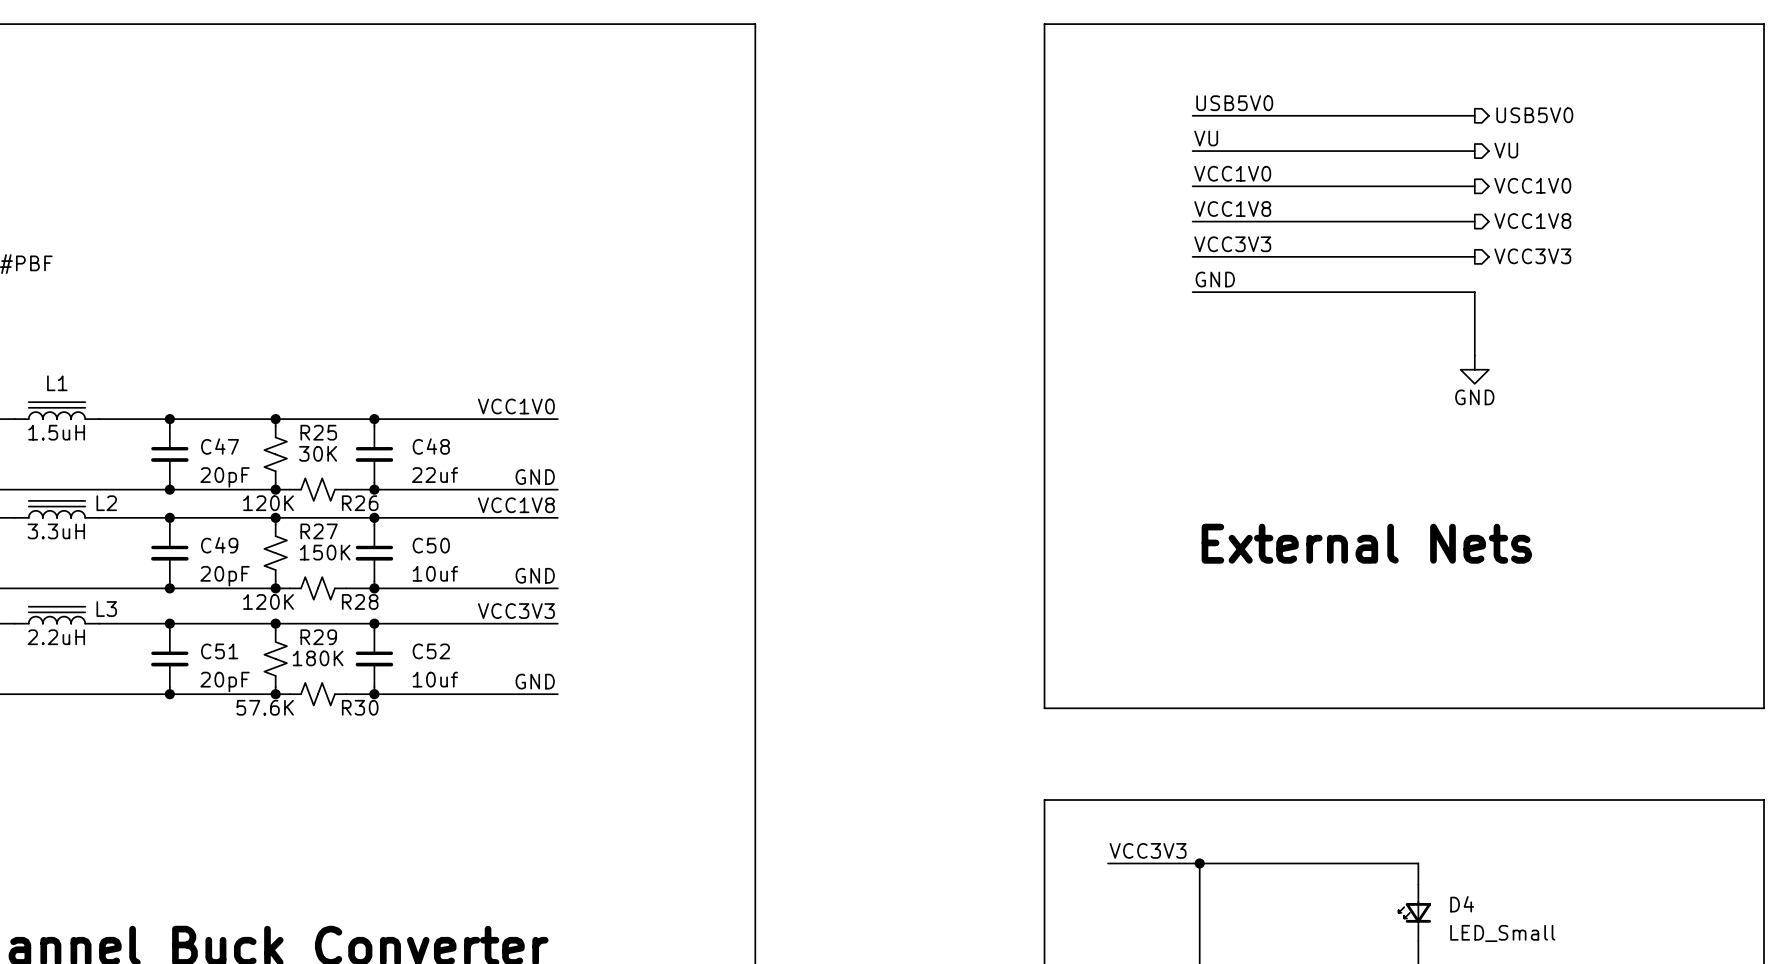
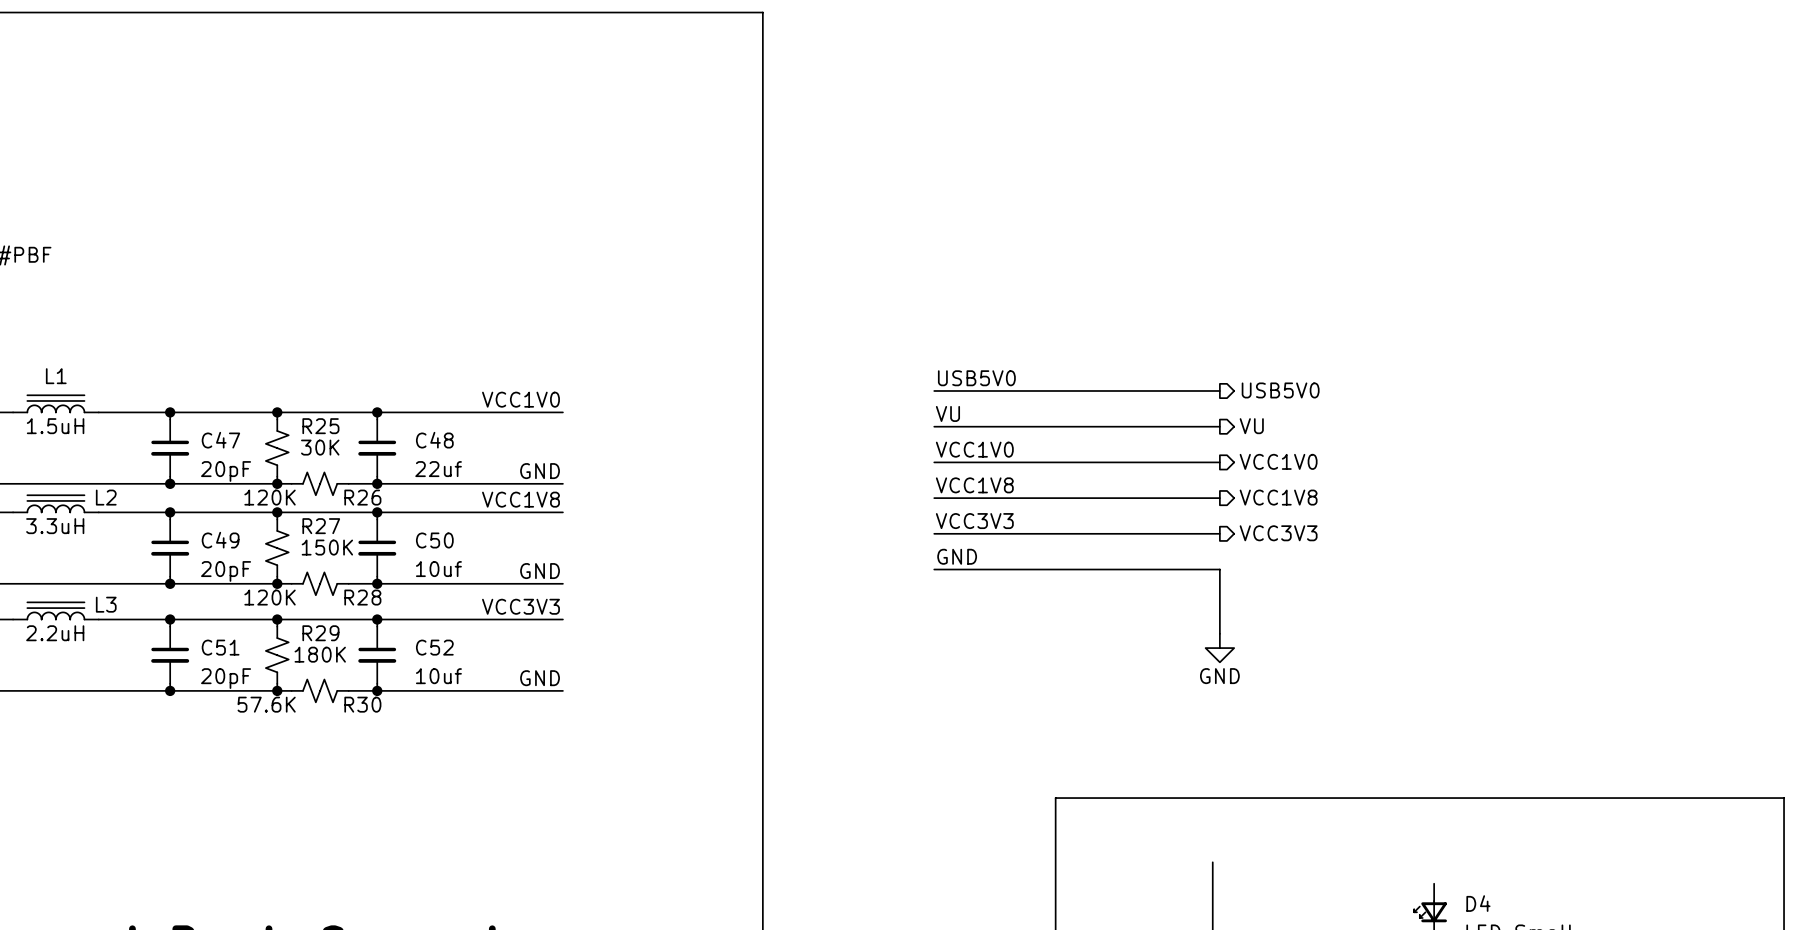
line: (1044, 24) (1044, 708) (1764, 708) (1764, 24) (1044, 24) -> none
label: USB5V0 (1234, 103) -> none
wire: (1192, 115) (1474, 115) -> none
hierarchical label: USB5V0 (1534, 115) -> none
label: VU (1206, 138) -> none
hierarchical label: VU (1506, 150) -> none
wire: (1192, 151) (1474, 151) -> none
label: VCC1V0 (1232, 173) -> none
hierarchical label: VCC1V0 (1532, 185) -> none
wire: (1192, 186) (1474, 186) -> none
label: VCC1V8 (1232, 209) -> none
wire: (1192, 221) (1474, 221) -> none
hierarchical label: VCC1V8 (1532, 221) -> none
label: VCC3V3 (1232, 244) -> none
wire: (1192, 256) (1474, 256) -> none
hierarchical label: VCC3V3 (1532, 256) -> none
label: GND (1215, 279) -> none
wire: (1192, 292) (1474, 292) (1474, 355) -> none
power symbol: GND (1474, 369) -> none
label: none -> USB5V0 (976, 378)
wire: none -> (934, 390) (1219, 390)
hierarchical label: none -> USB5V0 (1280, 390)
label: none -> VU (947, 413)
hierarchical label: none -> VU (1251, 426)
wire: none -> (934, 426) (1219, 426)
label: none -> VCC1V0 (974, 449)
hierarchical label: none -> VCC1V0 (1278, 461)
wire: none -> (934, 462) (1219, 462)
label: none -> VCC1V8 (974, 485)
wire: none -> (934, 498) (1219, 498)
hierarchical label: none -> VCC1V8 (1278, 497)
label: none -> VCC3V3 (974, 521)
hierarchical label: none -> VCC3V3 (1278, 533)
wire: none -> (934, 533) (1219, 533)
text: External Nets (1366, 543) -> none
label: none -> GND (957, 556)
wire: none -> (934, 569) (1219, 569) (1219, 633)
power symbol: none -> GND (1219, 648)
label: VCC3V3 (1148, 850) -> none
wire: (1108, 863) (1418, 863) (1418, 884) -> none
junction: (1199, 863) -> none

